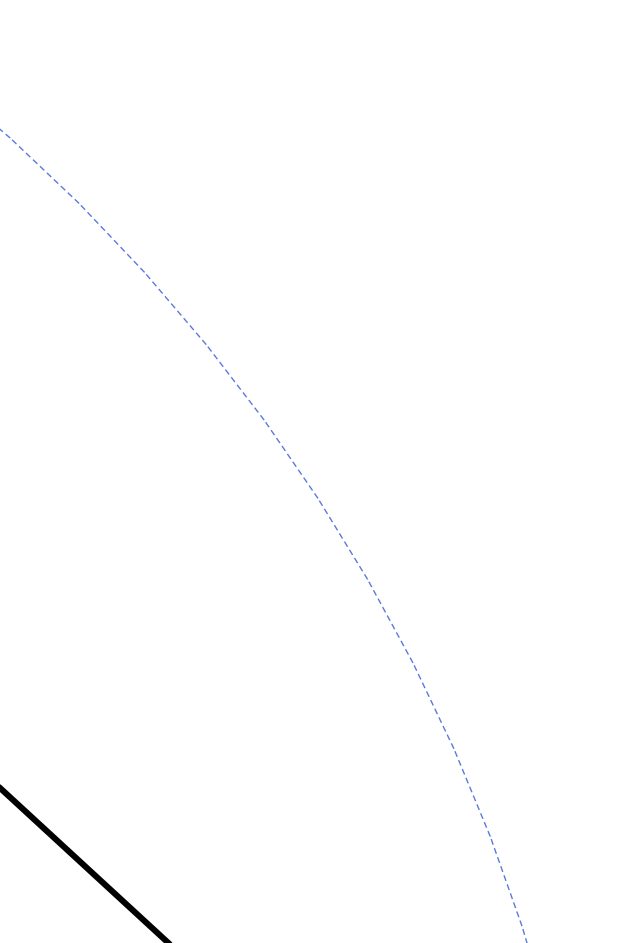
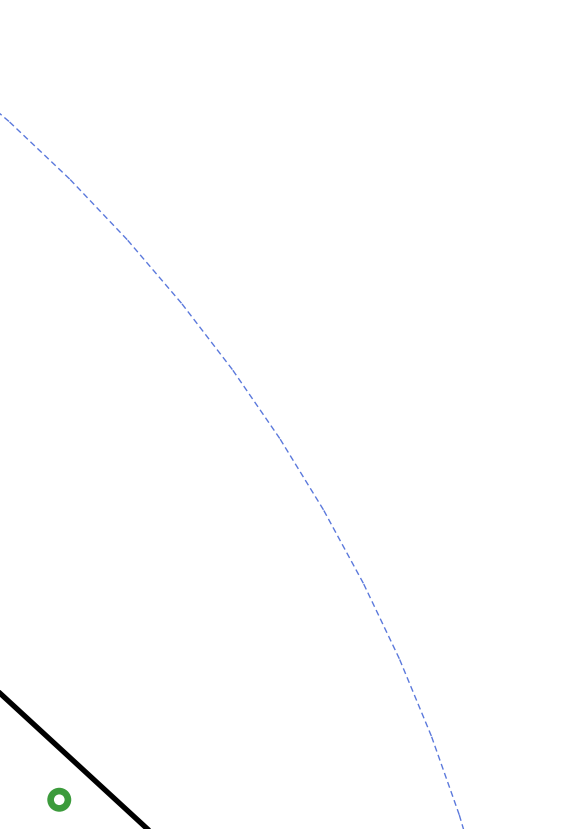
via: none -> (59, 799)

